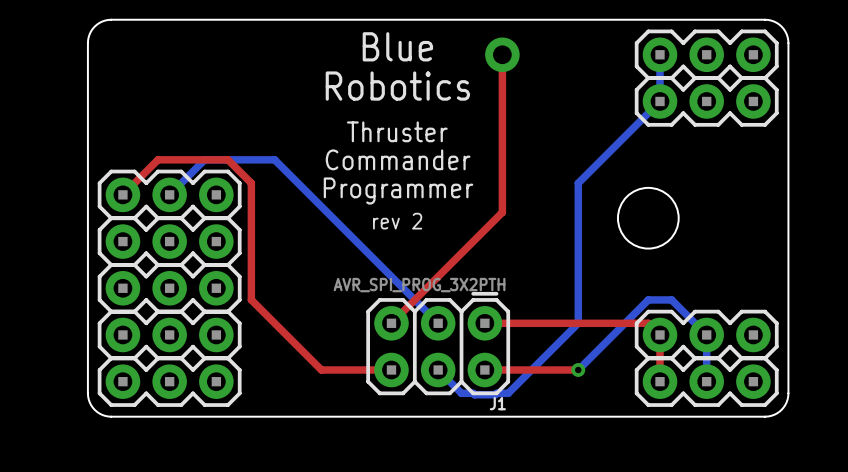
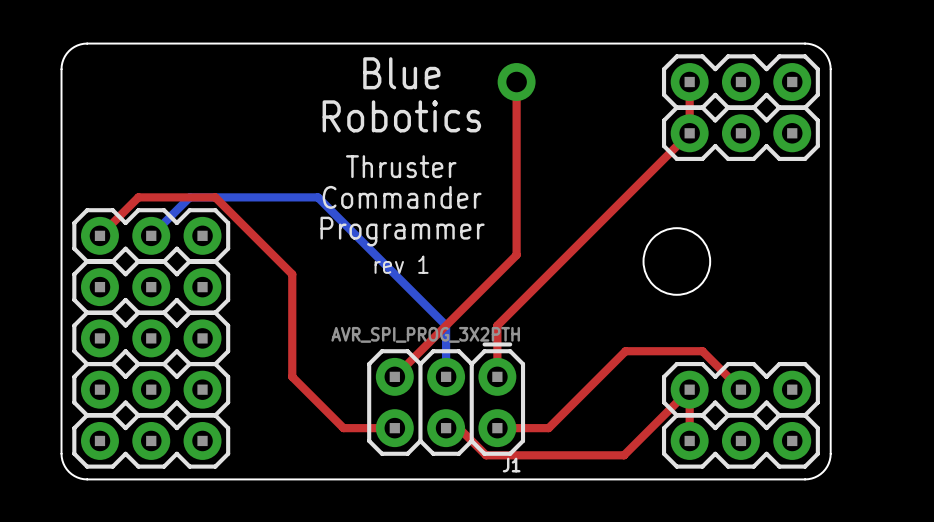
top track: none -> (689, 82) (689, 133) (497, 325) (497, 376)
bottom track: (660, 54) (660, 101) (578, 183) (578, 323) (508, 393) (461, 393) (438, 370) -> none
bottom track: (274, 159) (438, 323) -> (266, 197) (317, 197) (446, 325) (446, 376)
top track: (251, 183) (251, 299) (321, 370) (344, 370) -> (240, 223) (292, 274) (292, 376) (343, 428)
text: rev 2 (397, 221) -> rev 1 (401, 264)
top track: (484, 323) (648, 323) (660, 334) -> (446, 428) (458, 428) (486, 455) (624, 455) (689, 389)
top track: (531, 370) (578, 370) -> (548, 428) (625, 351) (702, 351) (740, 389)
bottom track: (578, 370) (648, 299) (671, 299) (706, 334) (706, 381) -> none
via: (578, 370) -> none

